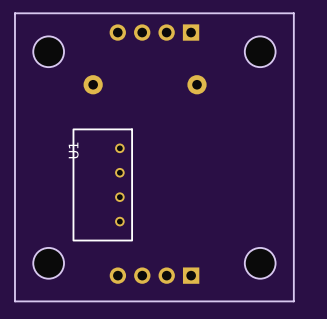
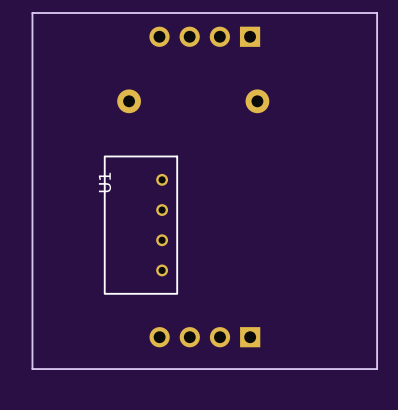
part: (48, 51) -> none
part: (260, 51) -> none
part: (48, 263) -> none
part: (260, 263) -> none

